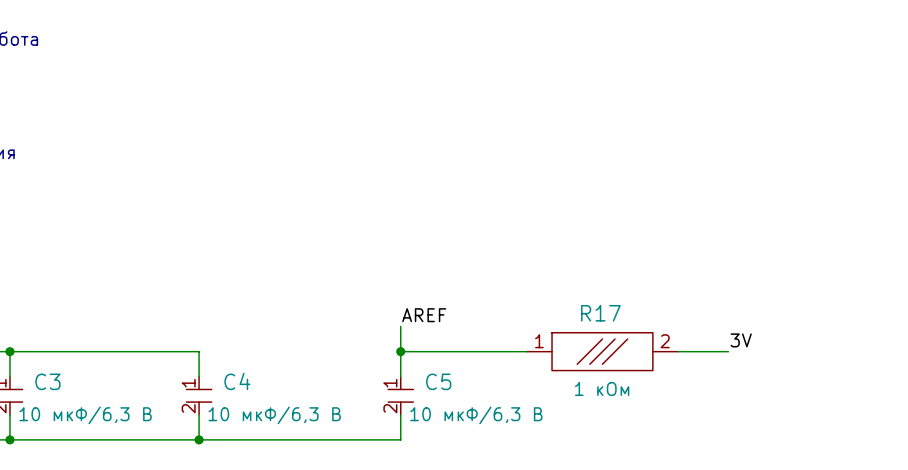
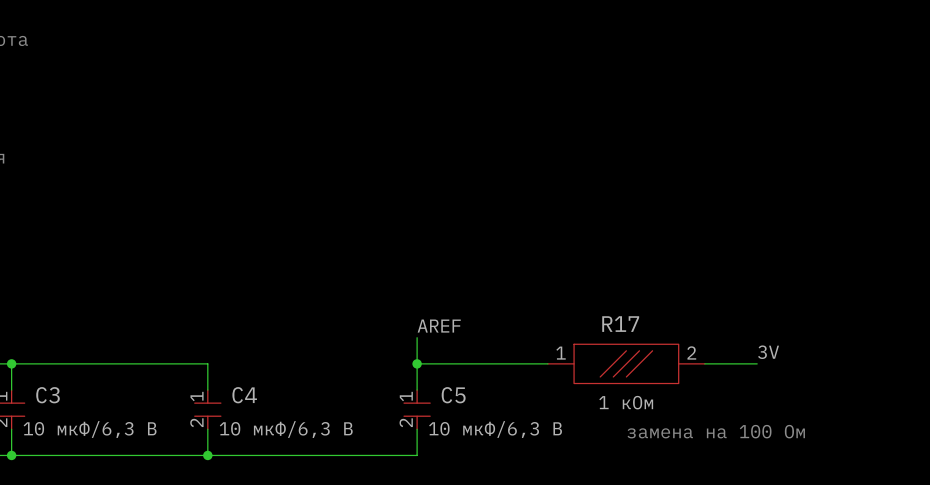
text: none -> замена на 100 Ом (716, 431)

